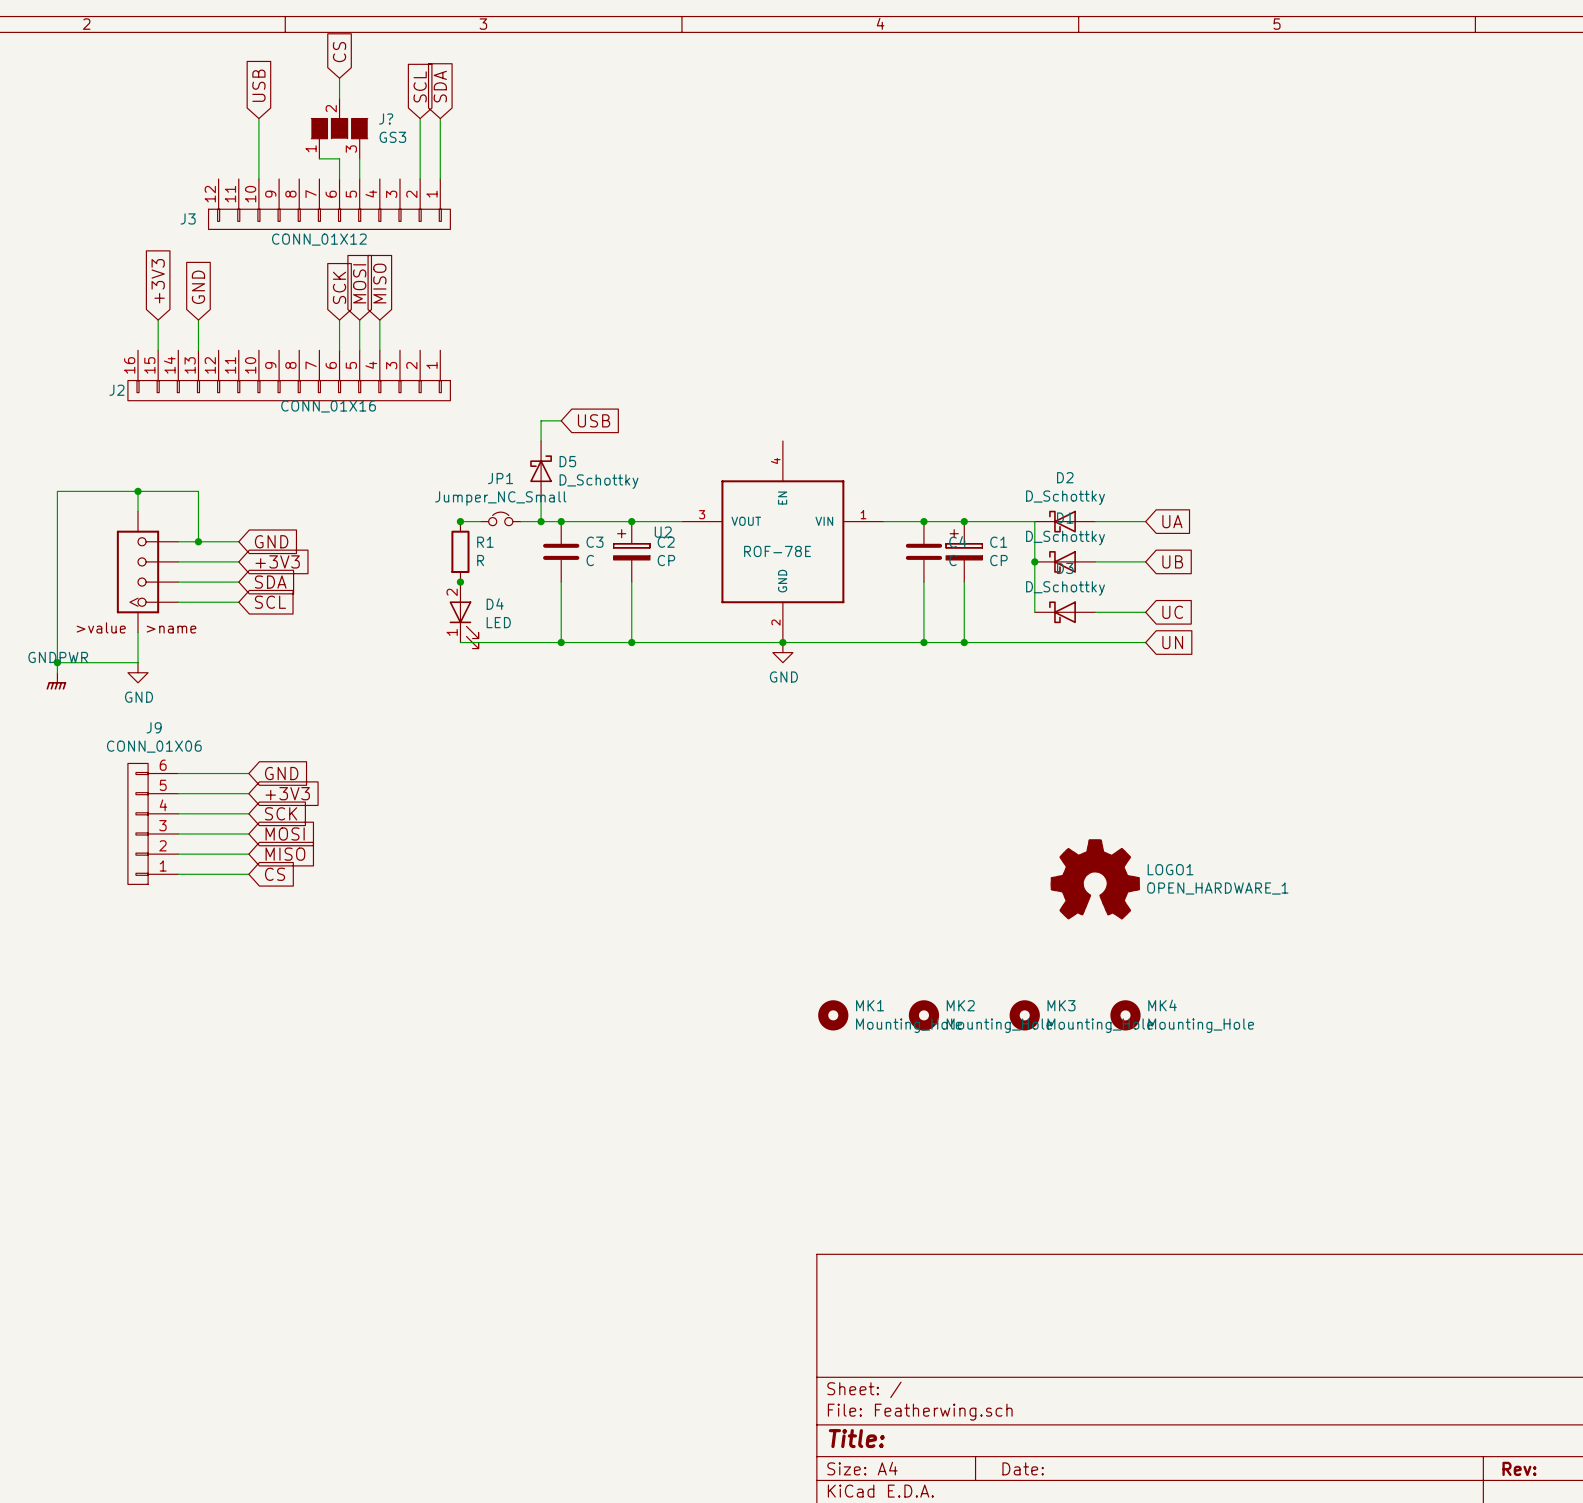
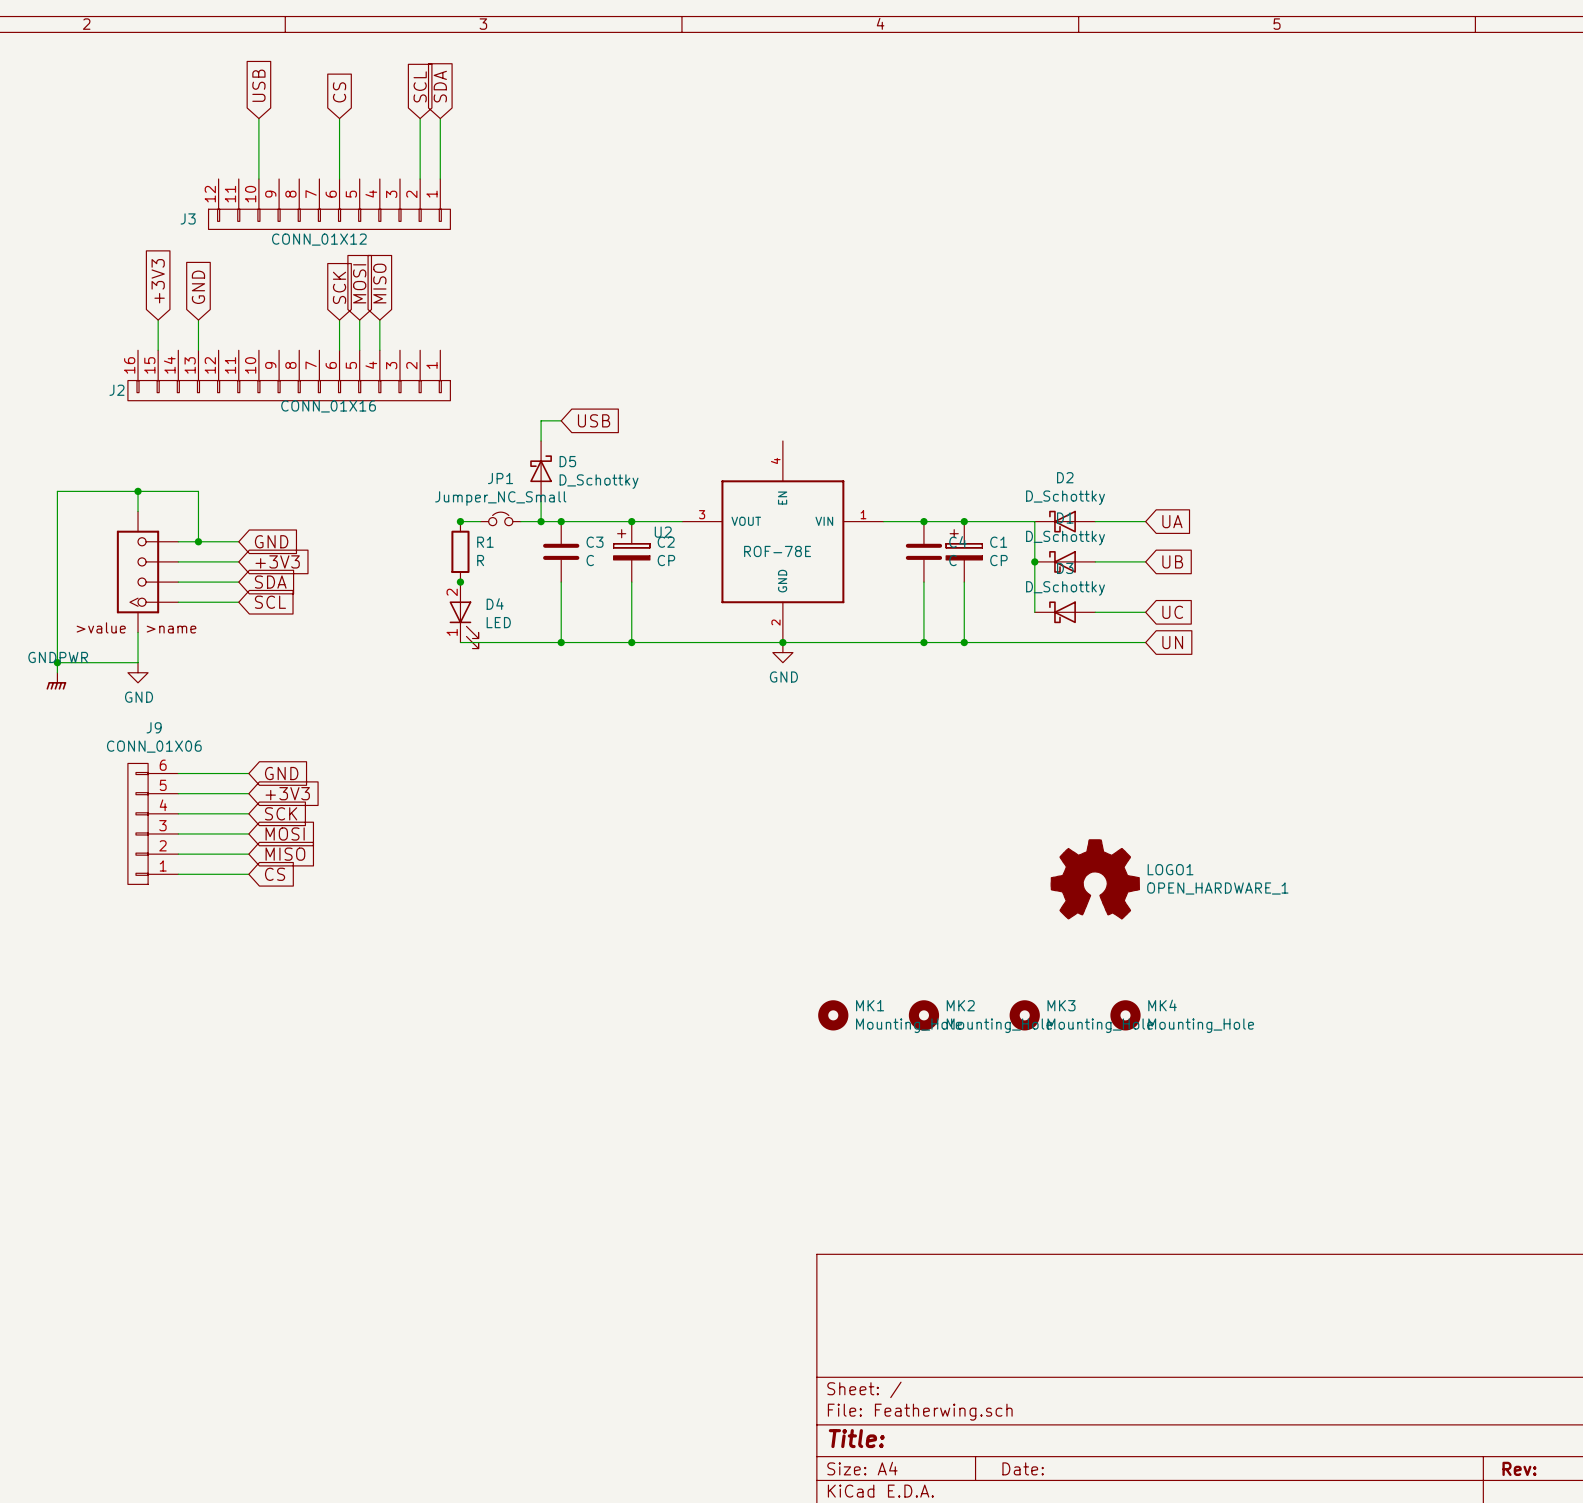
global label position: CS (339, 52) -> CS (339, 92)
wire: (339, 78) (339, 98) -> none
J?: GS3 (339, 128) -> none
wire: (319, 158) (339, 158) -> (339, 118) (339, 158)
wire: (359, 158) (359, 179) -> none

